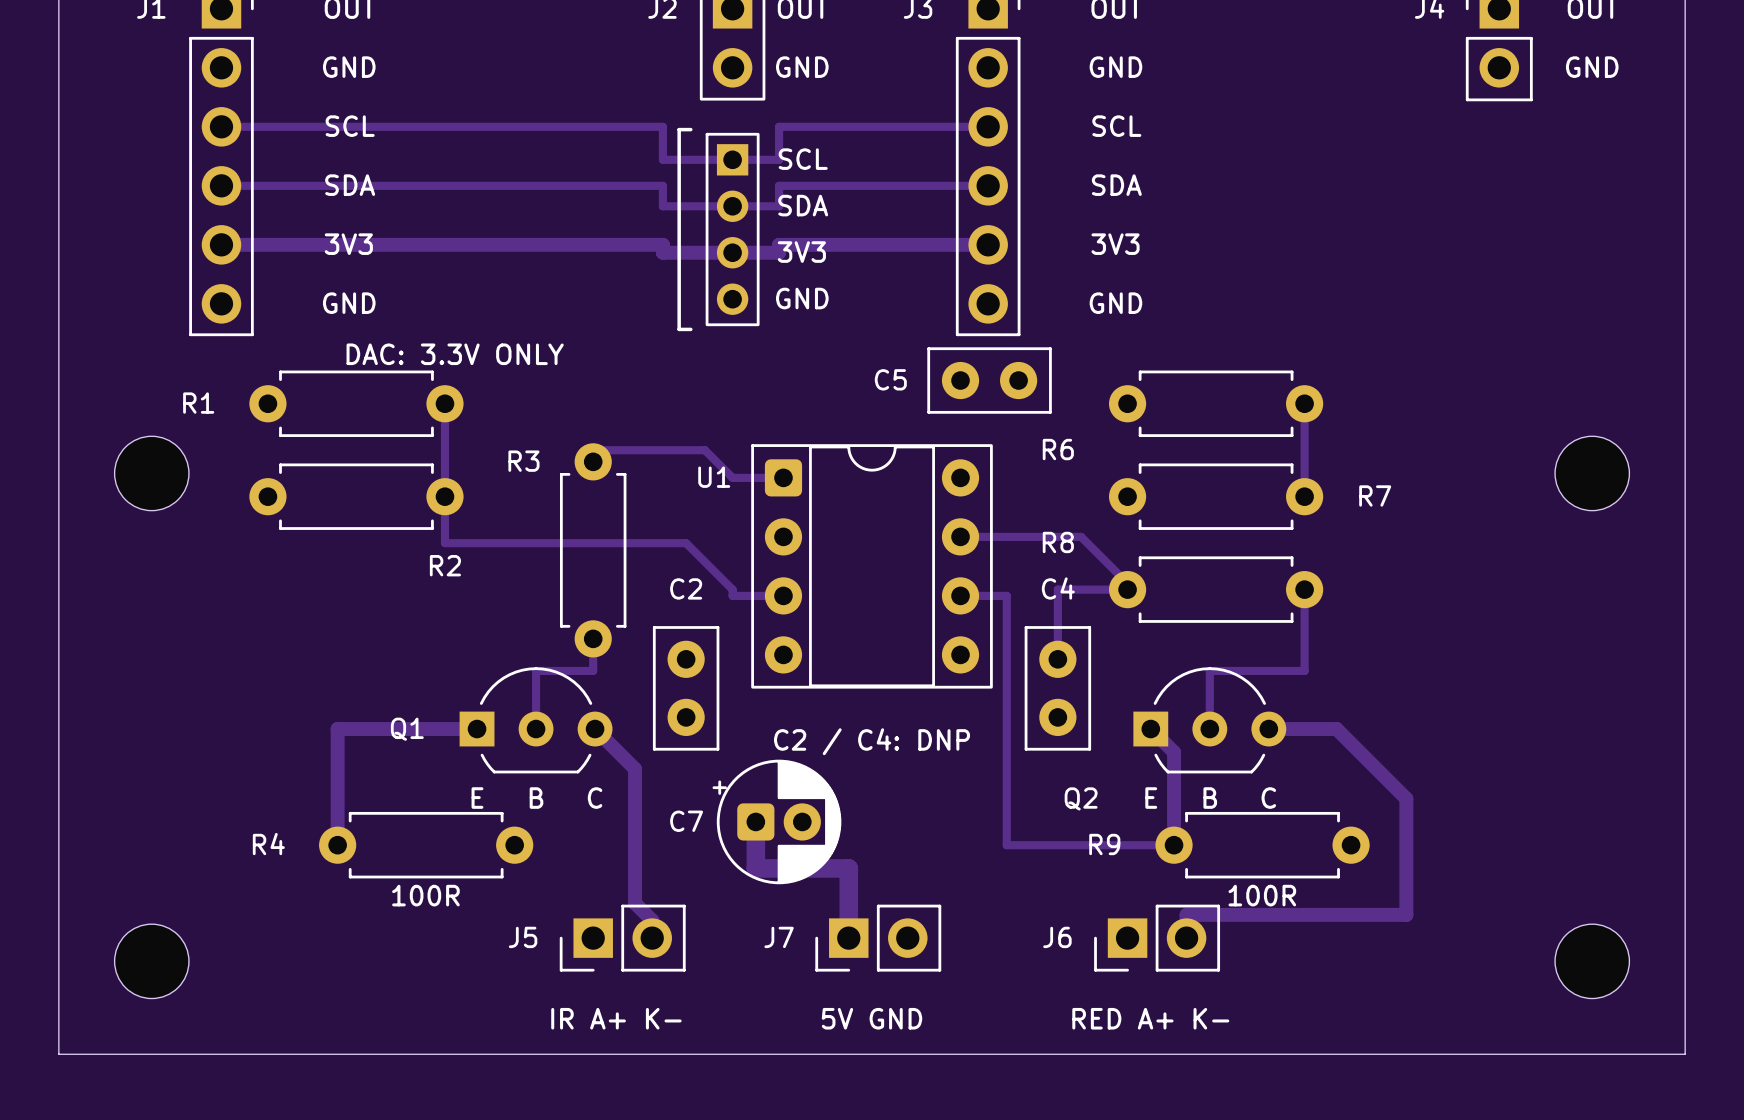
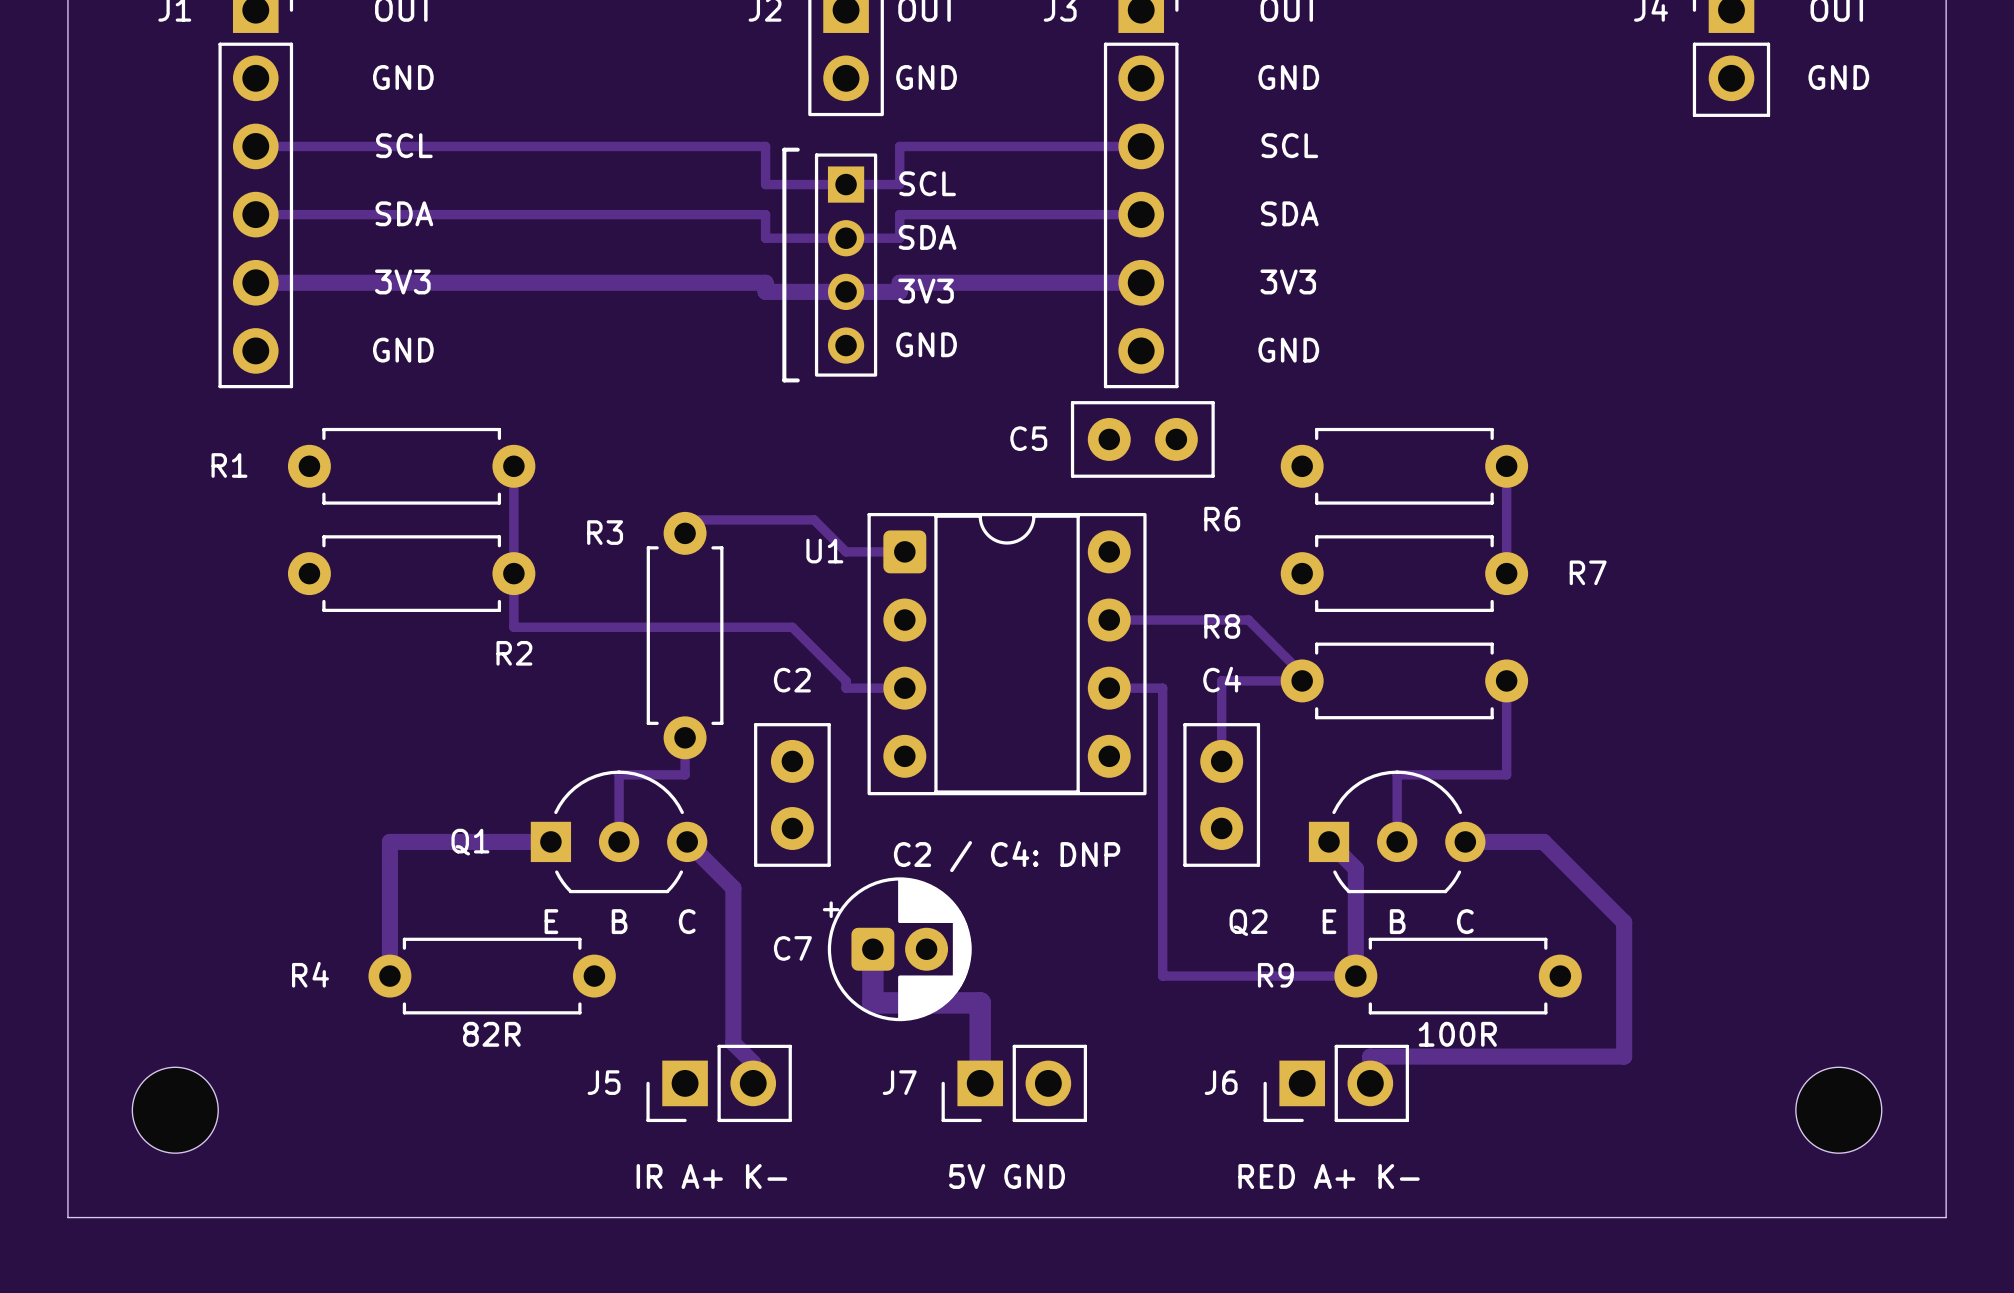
text: DAC: 3.3V ONLY (455, 354) -> none
part: (151, 473) -> none
part: (1592, 473) -> none
text: 100R (425, 895) -> 82R (491, 1034)

